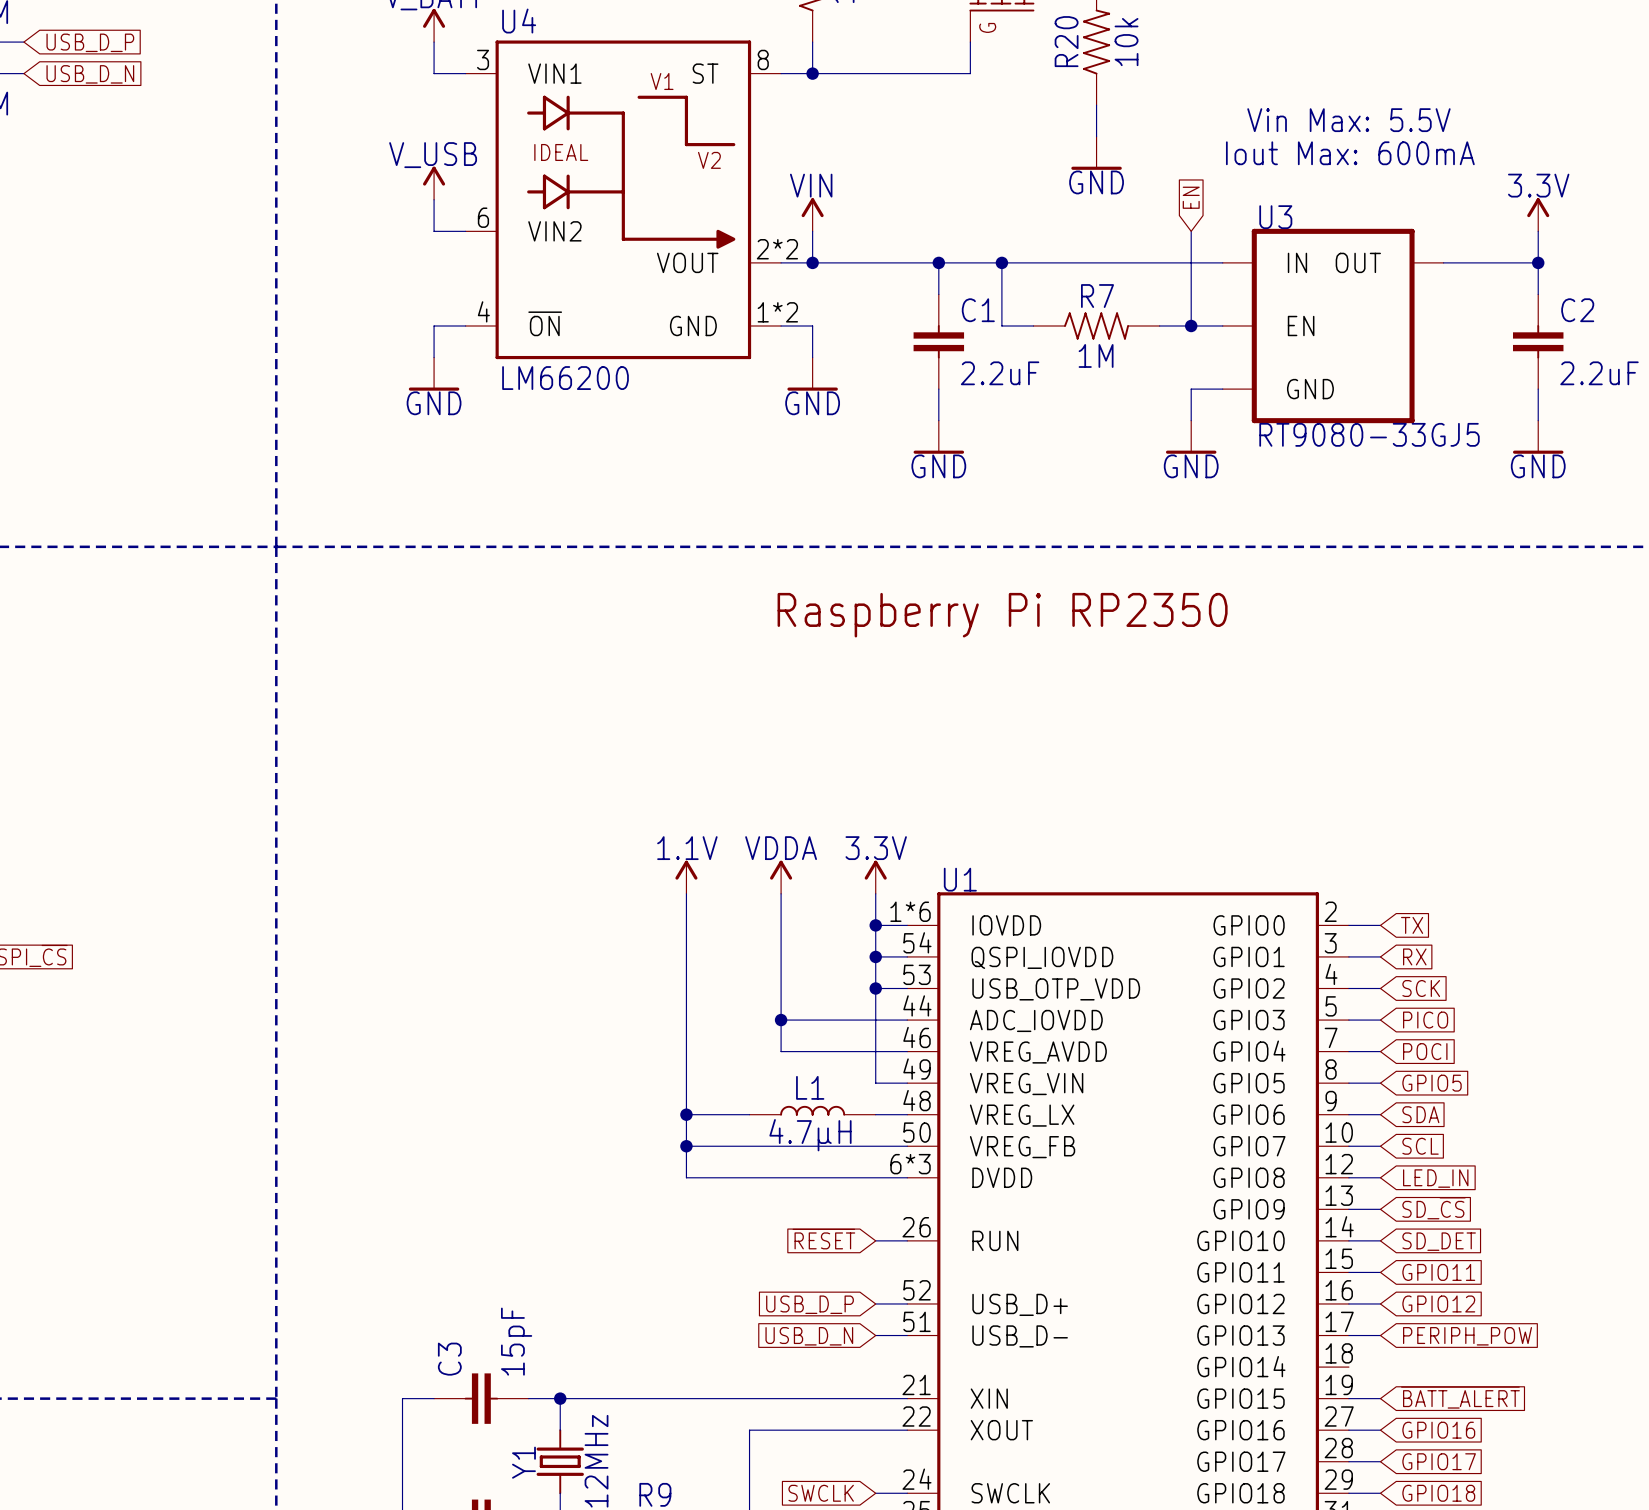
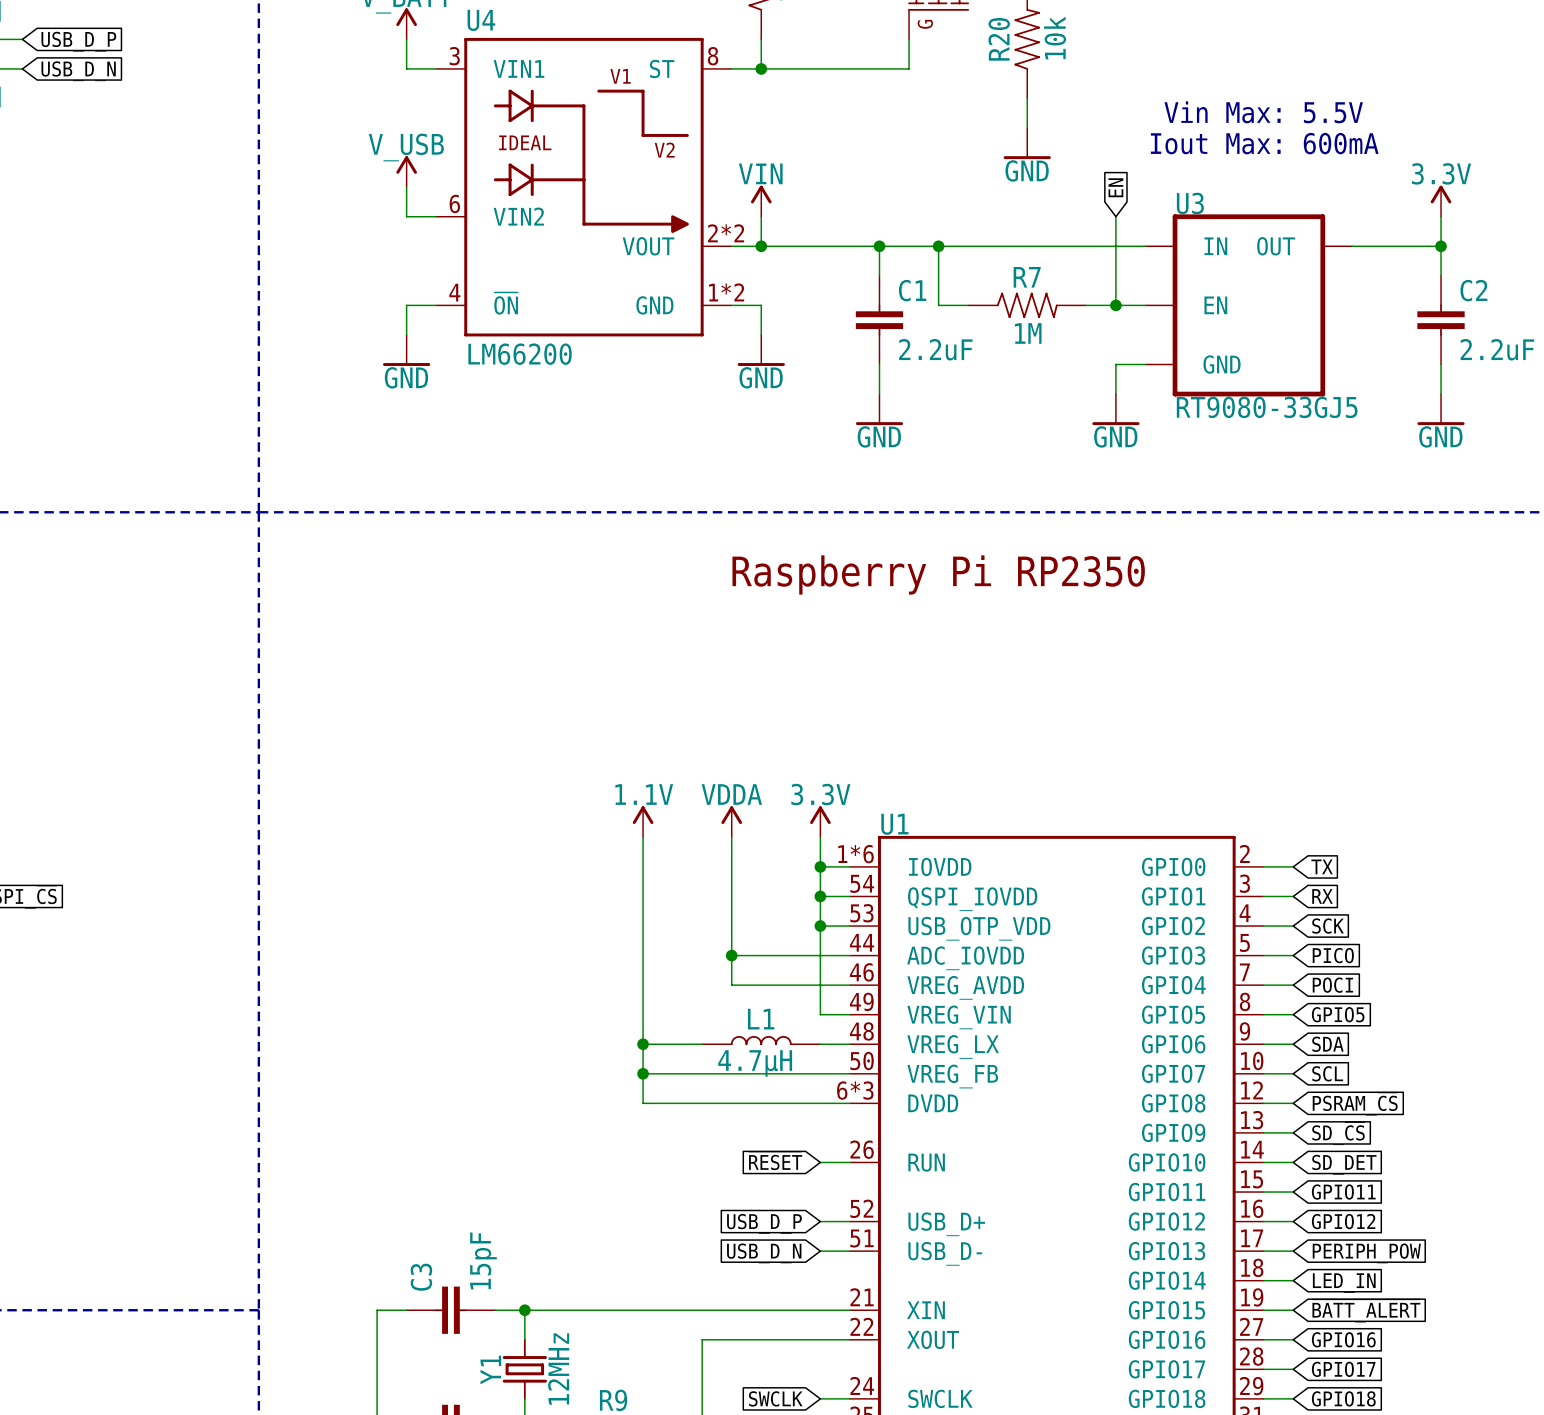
global label: LED_IN (1435, 1178) -> PSRAM_~{CS} (1355, 1104)
wire: none -> (1263, 1280) (1293, 1280)
global label: none -> LED_IN (1344, 1283)

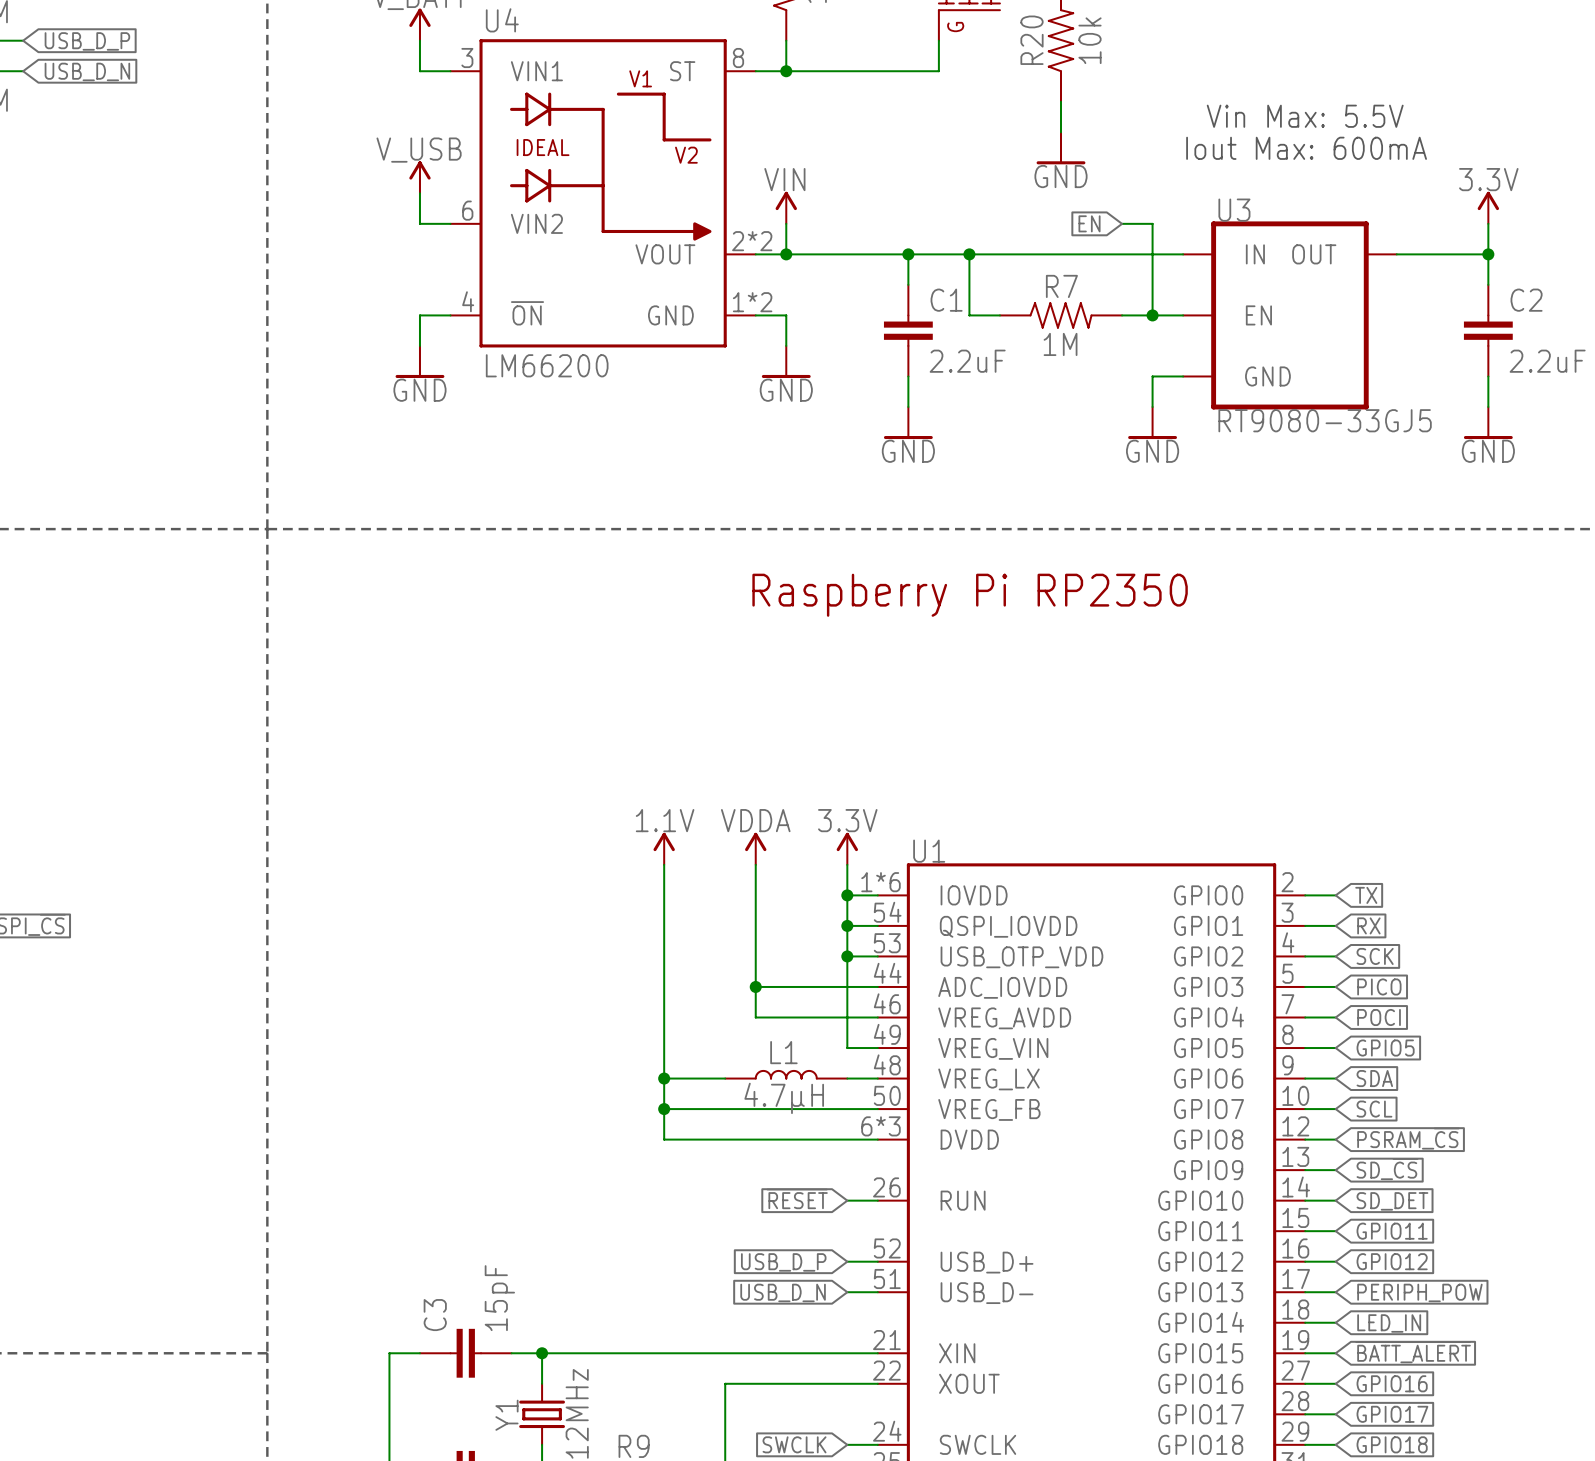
global label rotation: 0° (1115, 187) -> 90° counterclockwise (1089, 223)
global label position: EN (1115, 187) -> EN (1089, 223)
wire: none -> (1122, 223) (1152, 223)

